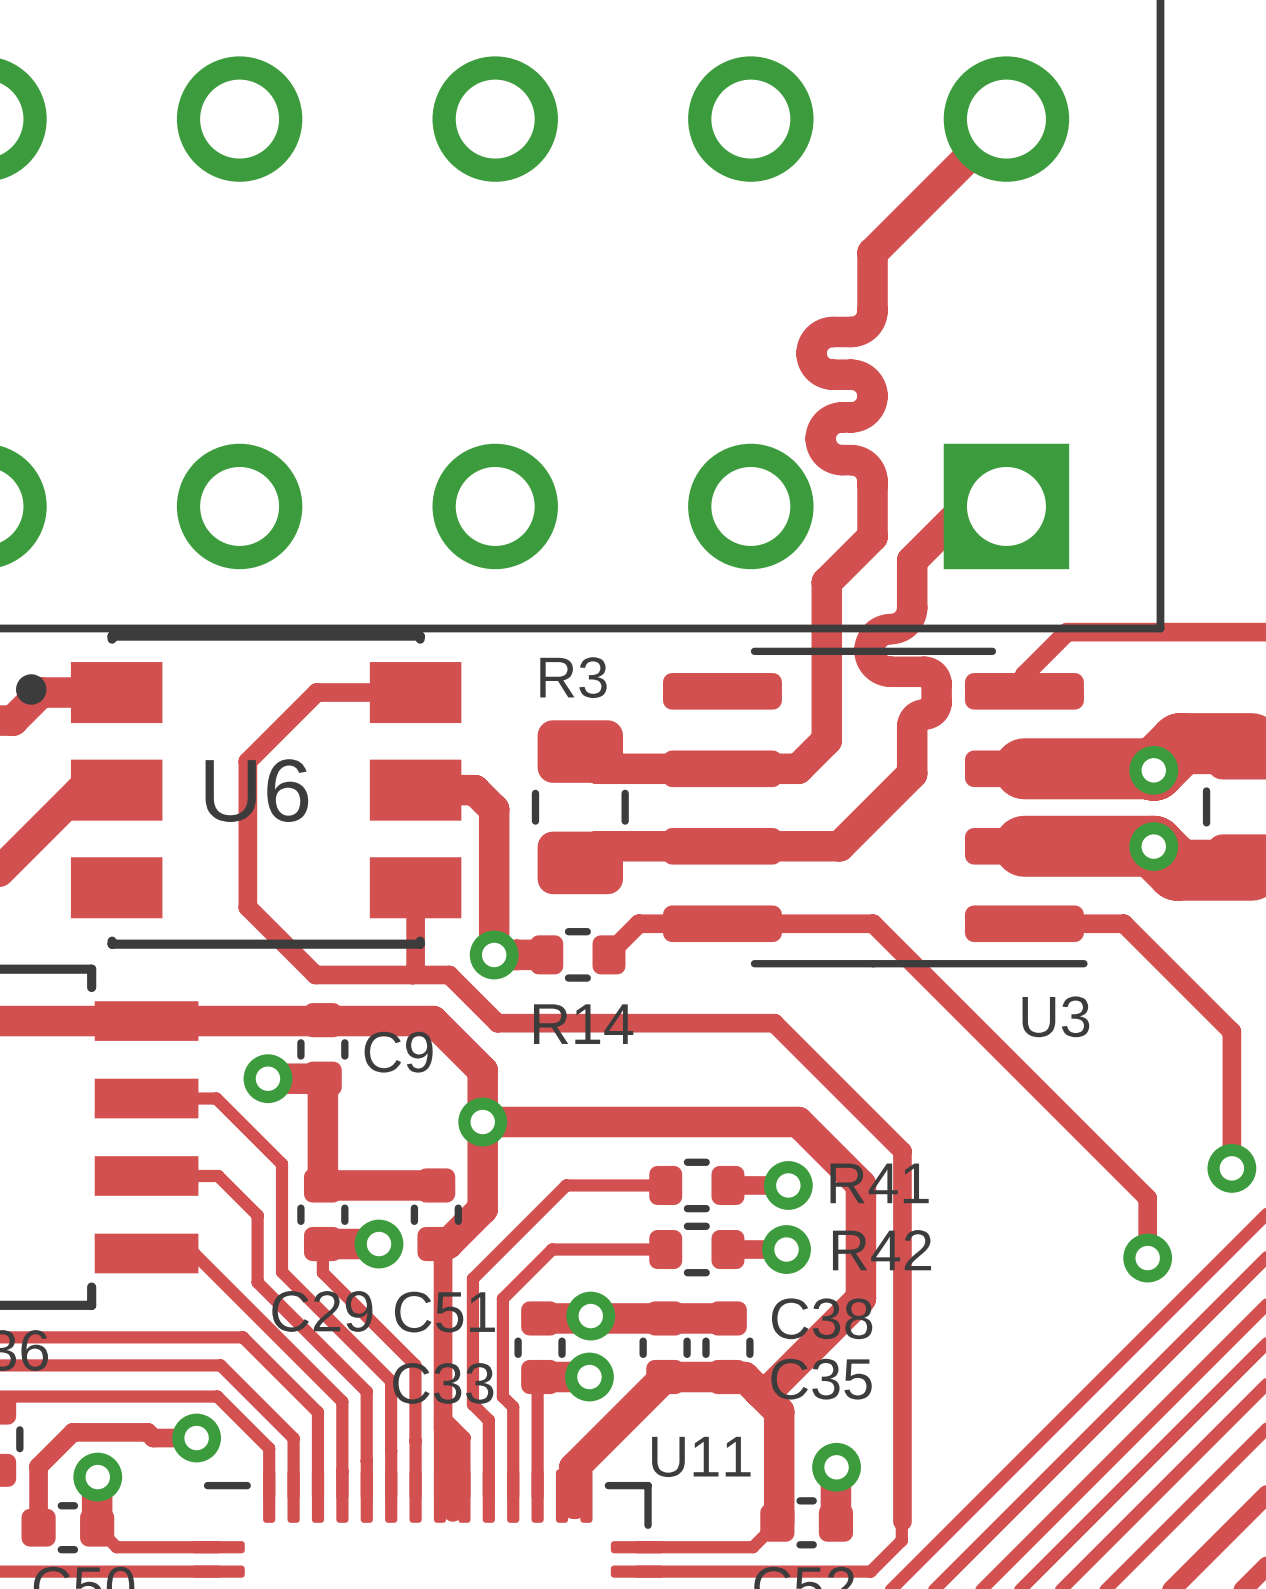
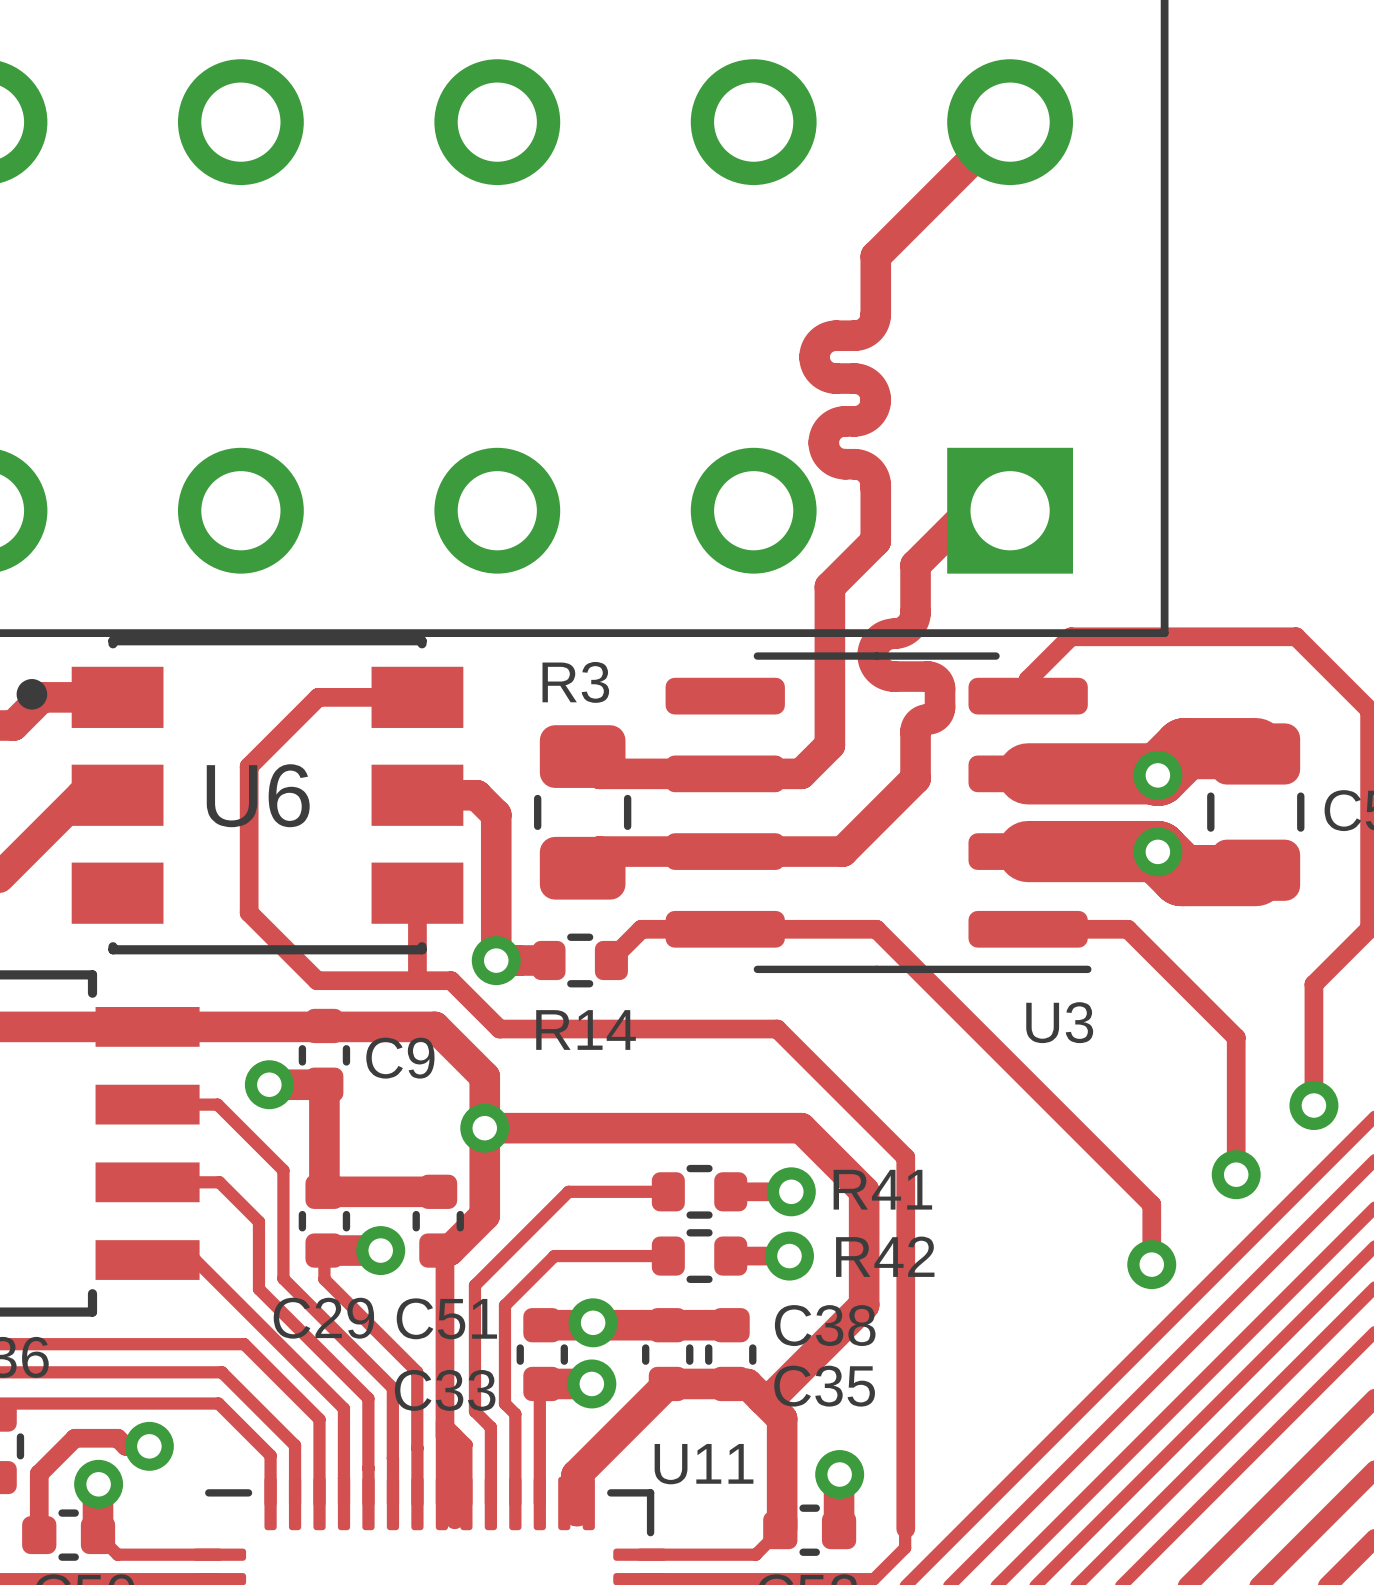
track: (72, 1432) (147, 1432) (153, 1438) (196, 1438) -> (73, 1439) (117, 1438) (125, 1446) (149, 1446)
via position: (196, 1438) -> (149, 1446)

